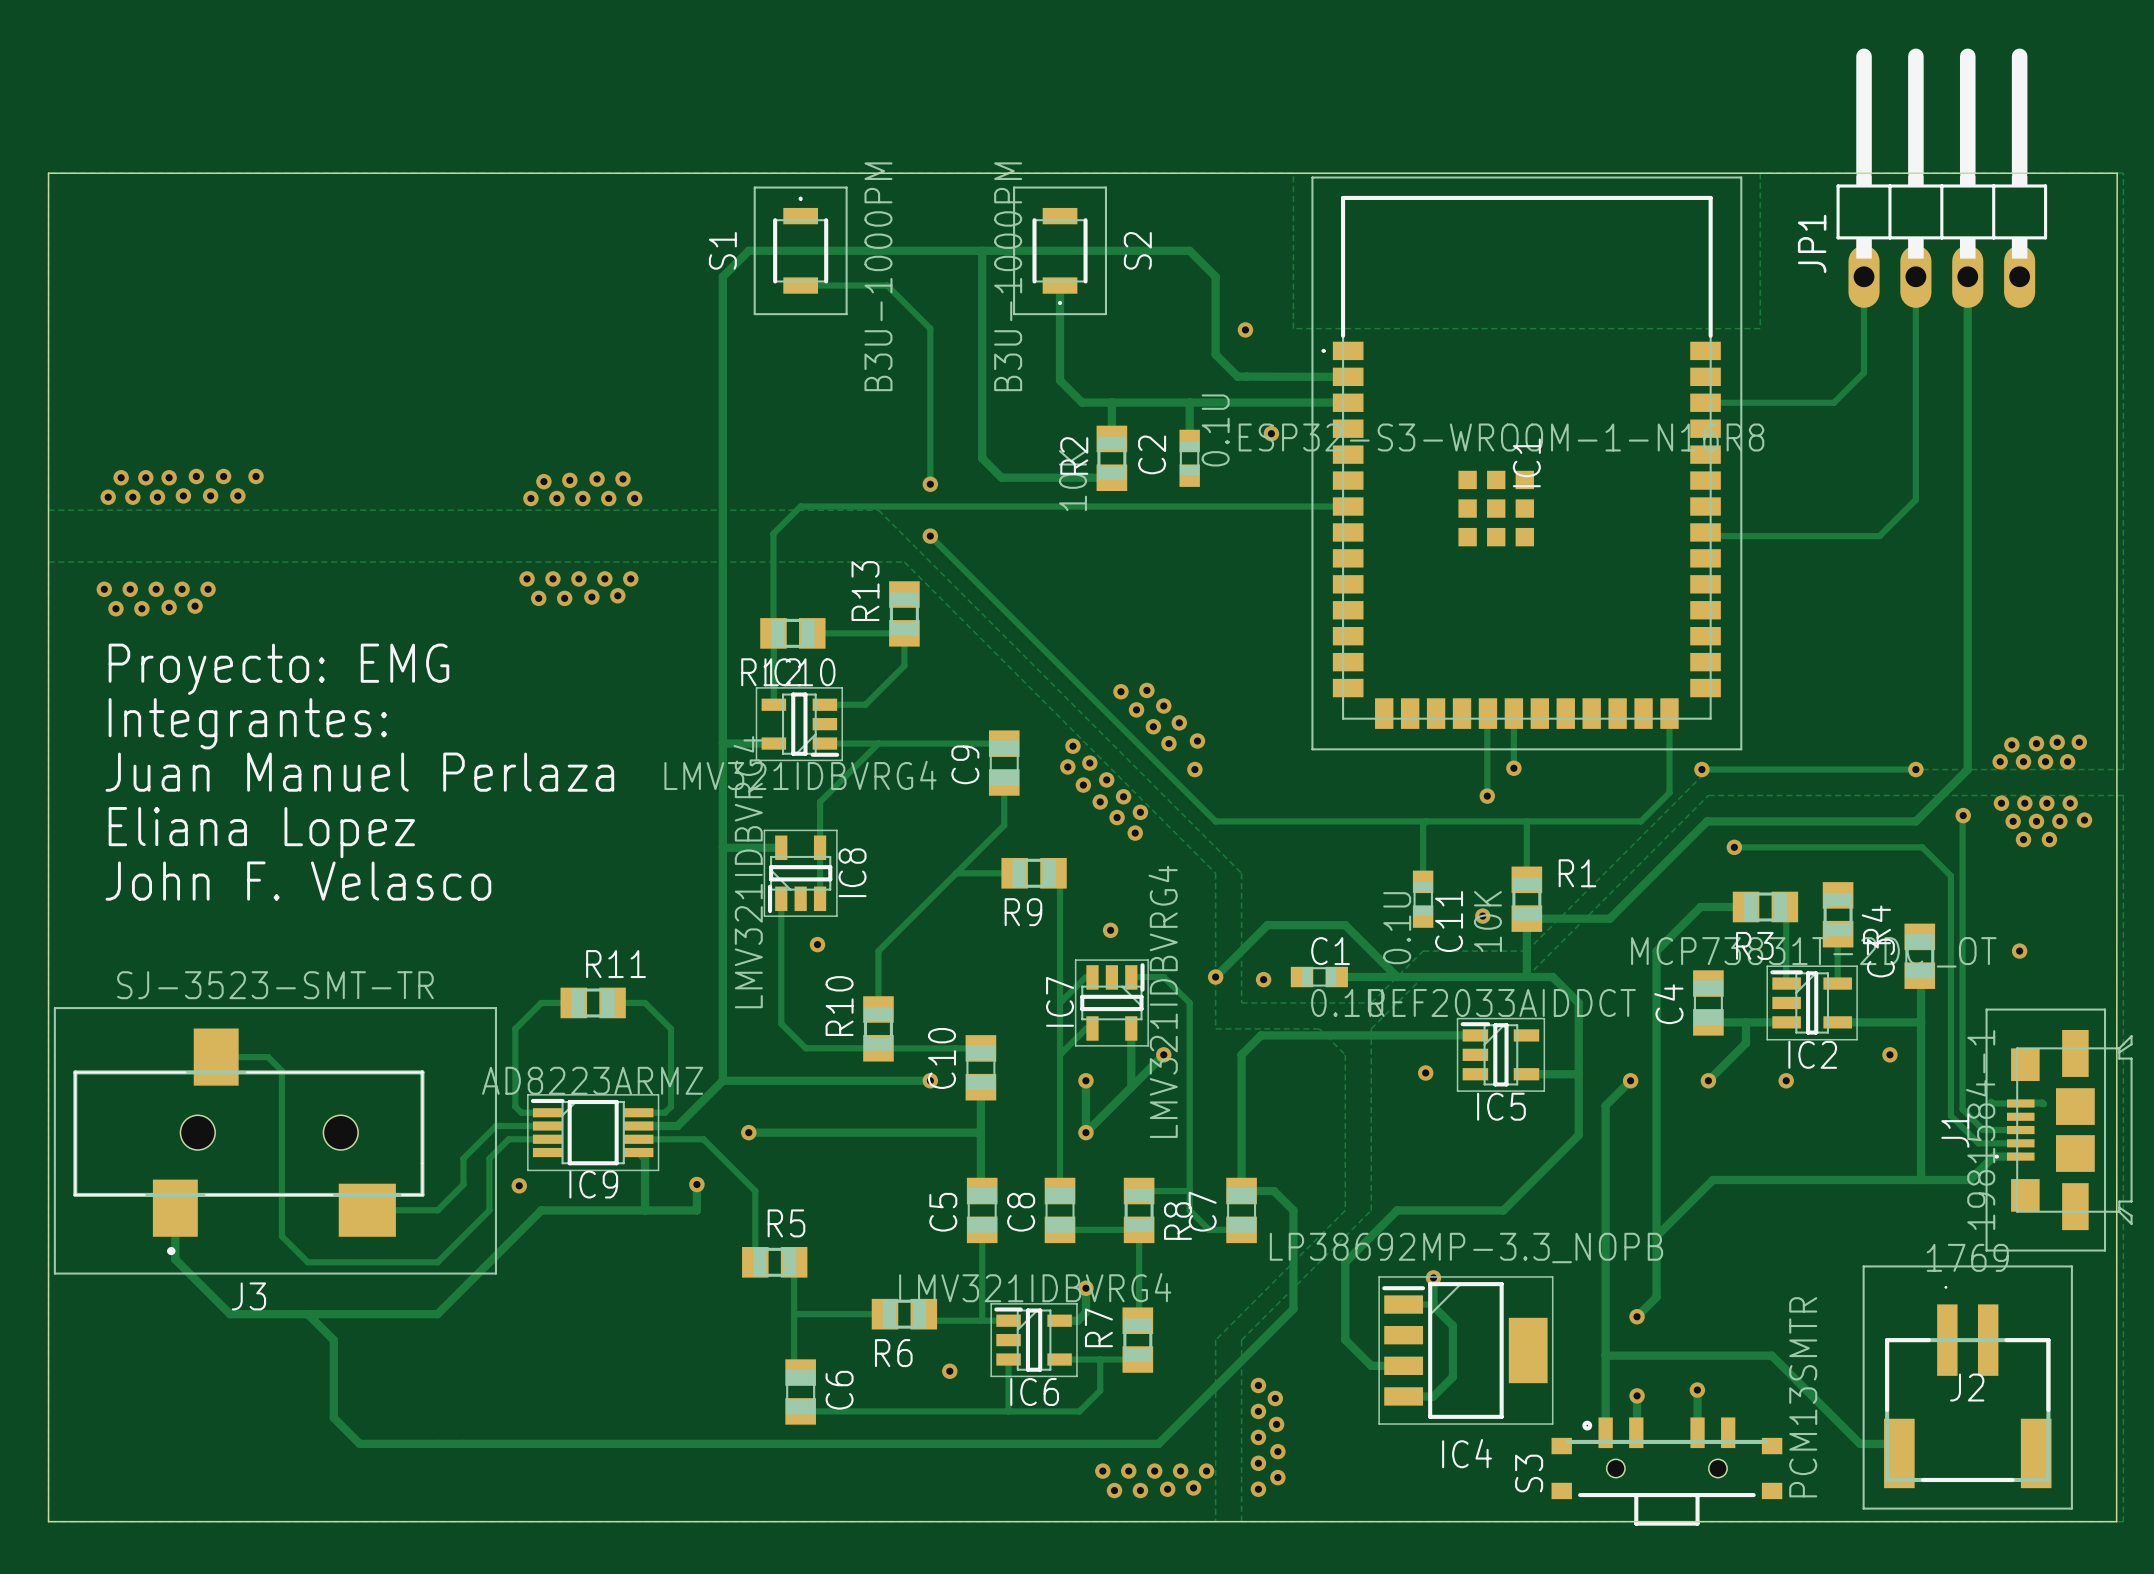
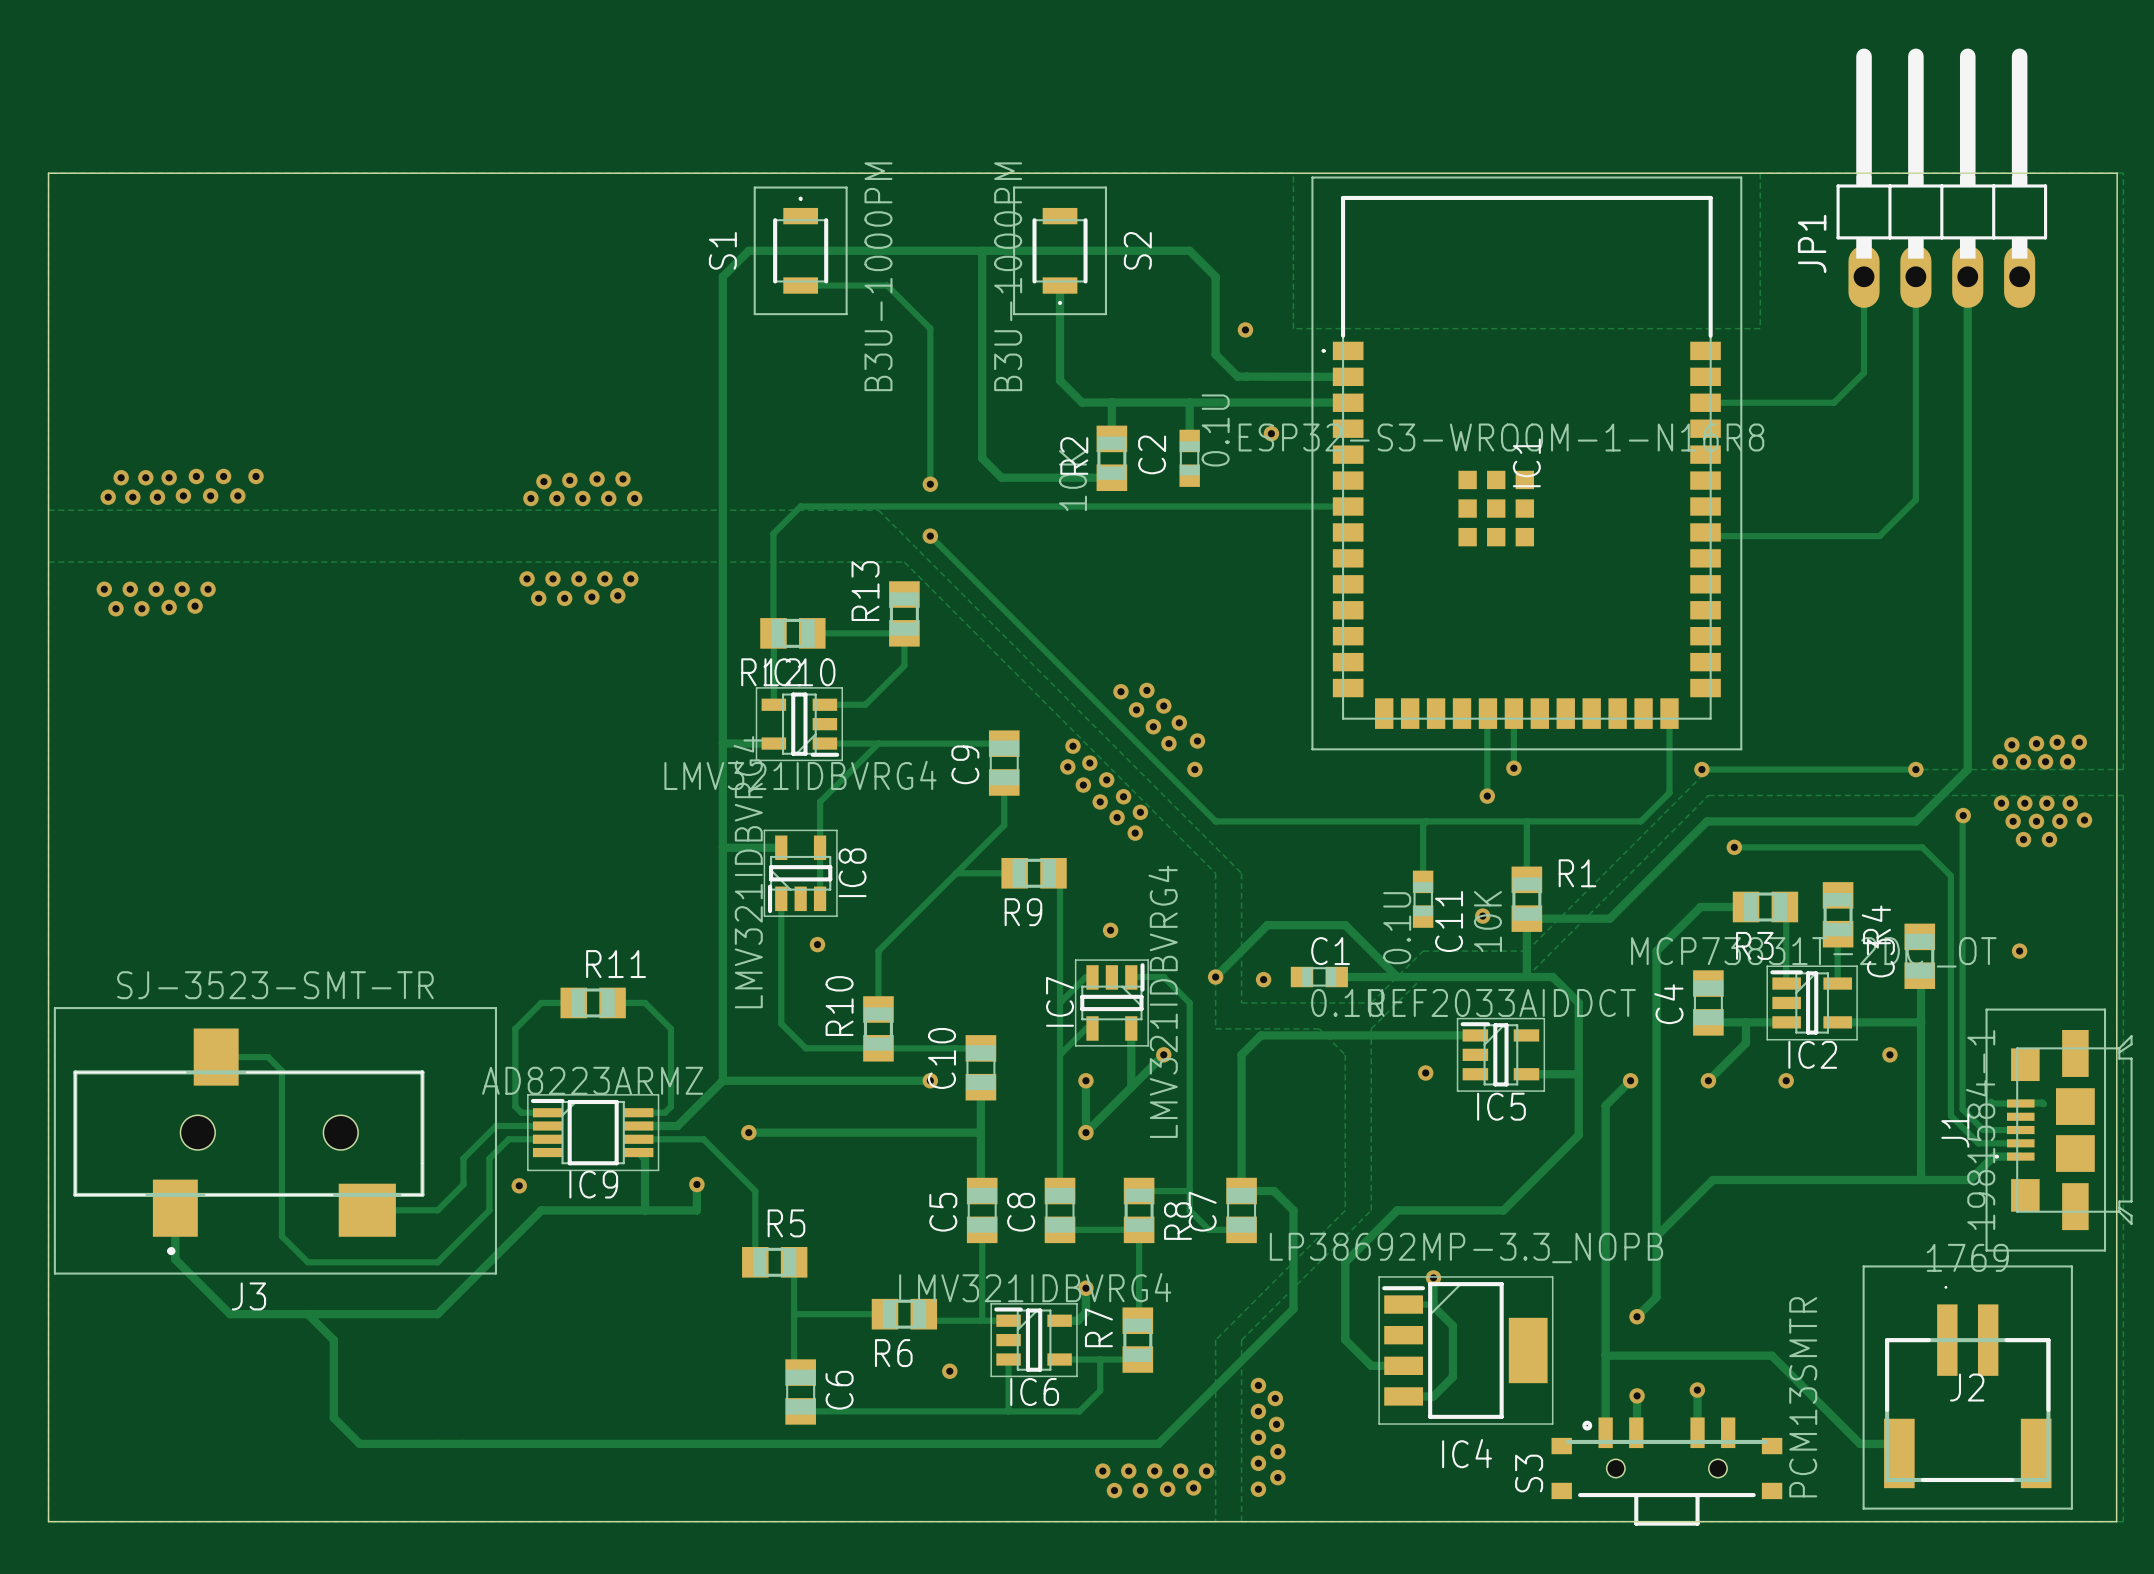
text: Proyecto: EMG (278, 669) -> none
text: Integrantes: (247, 723) -> none
text: Juan Manuel Perlaza (359, 772) -> none
text: Eliana Lopez (261, 832) -> none
text: John F. Velasco (298, 881) -> none

